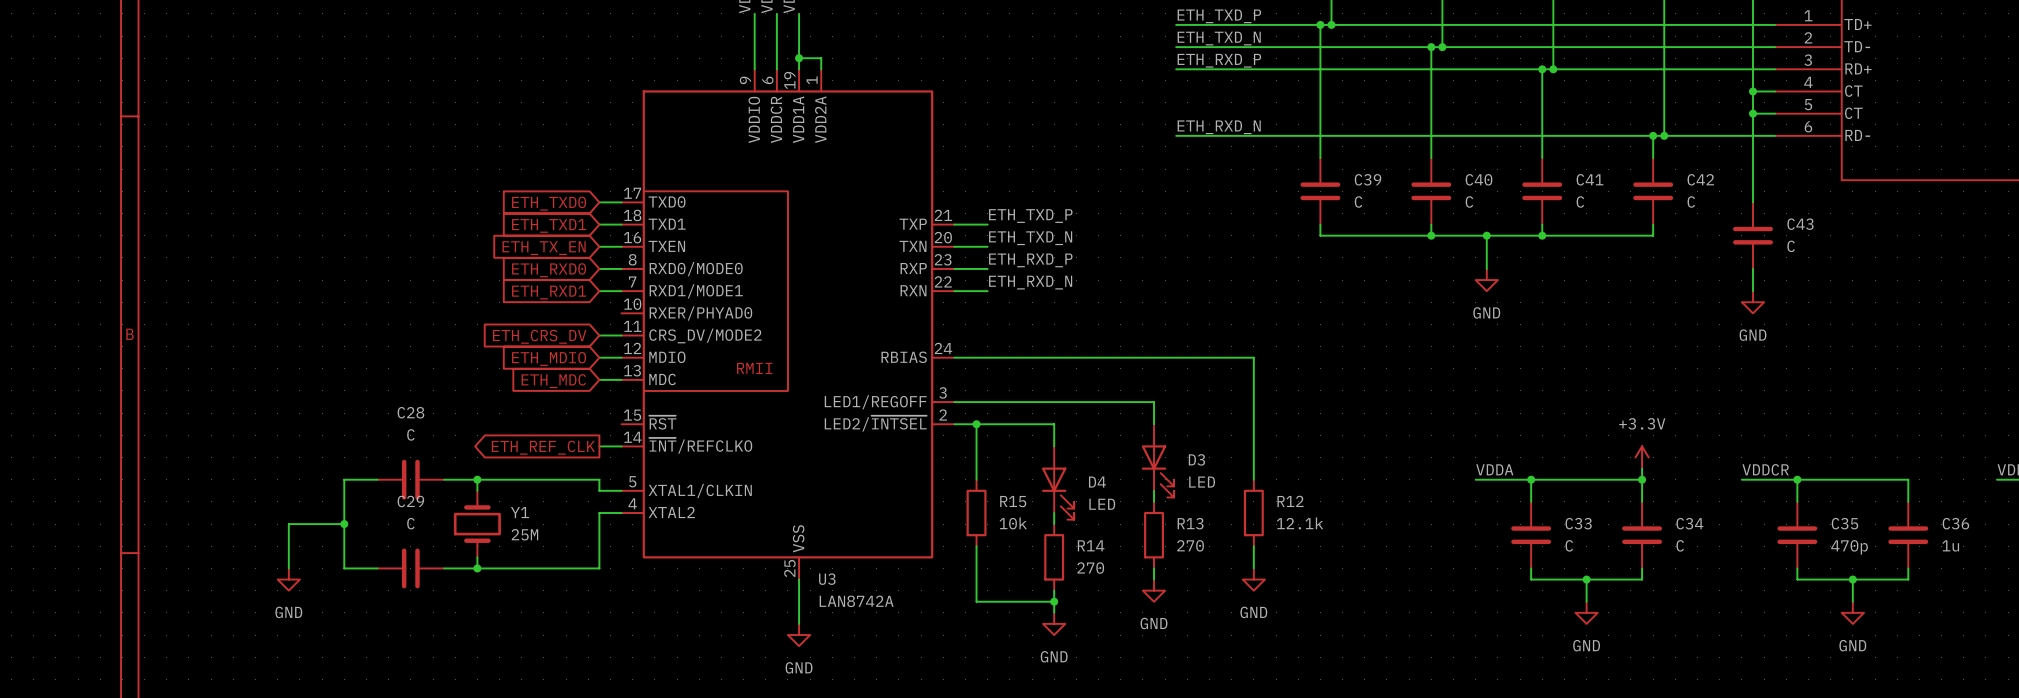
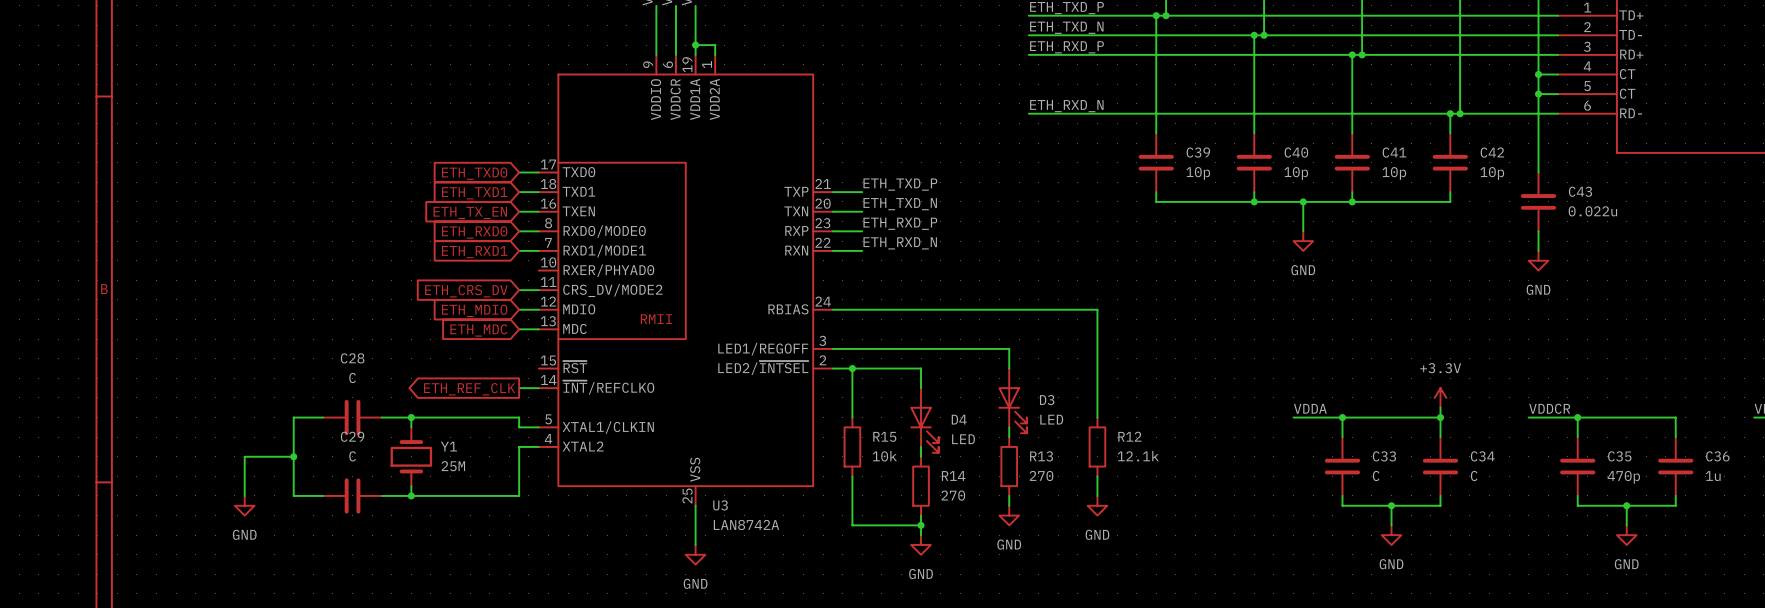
C39 value: C (1358, 201) -> 10p (1198, 173)
C40 value: C (1469, 201) -> 10p (1296, 173)
C41 value: C (1580, 201) -> 10p (1394, 173)
C42 value: C (1691, 201) -> 10p (1492, 173)
C43 value: C (1791, 246) -> 0.022u (1592, 211)

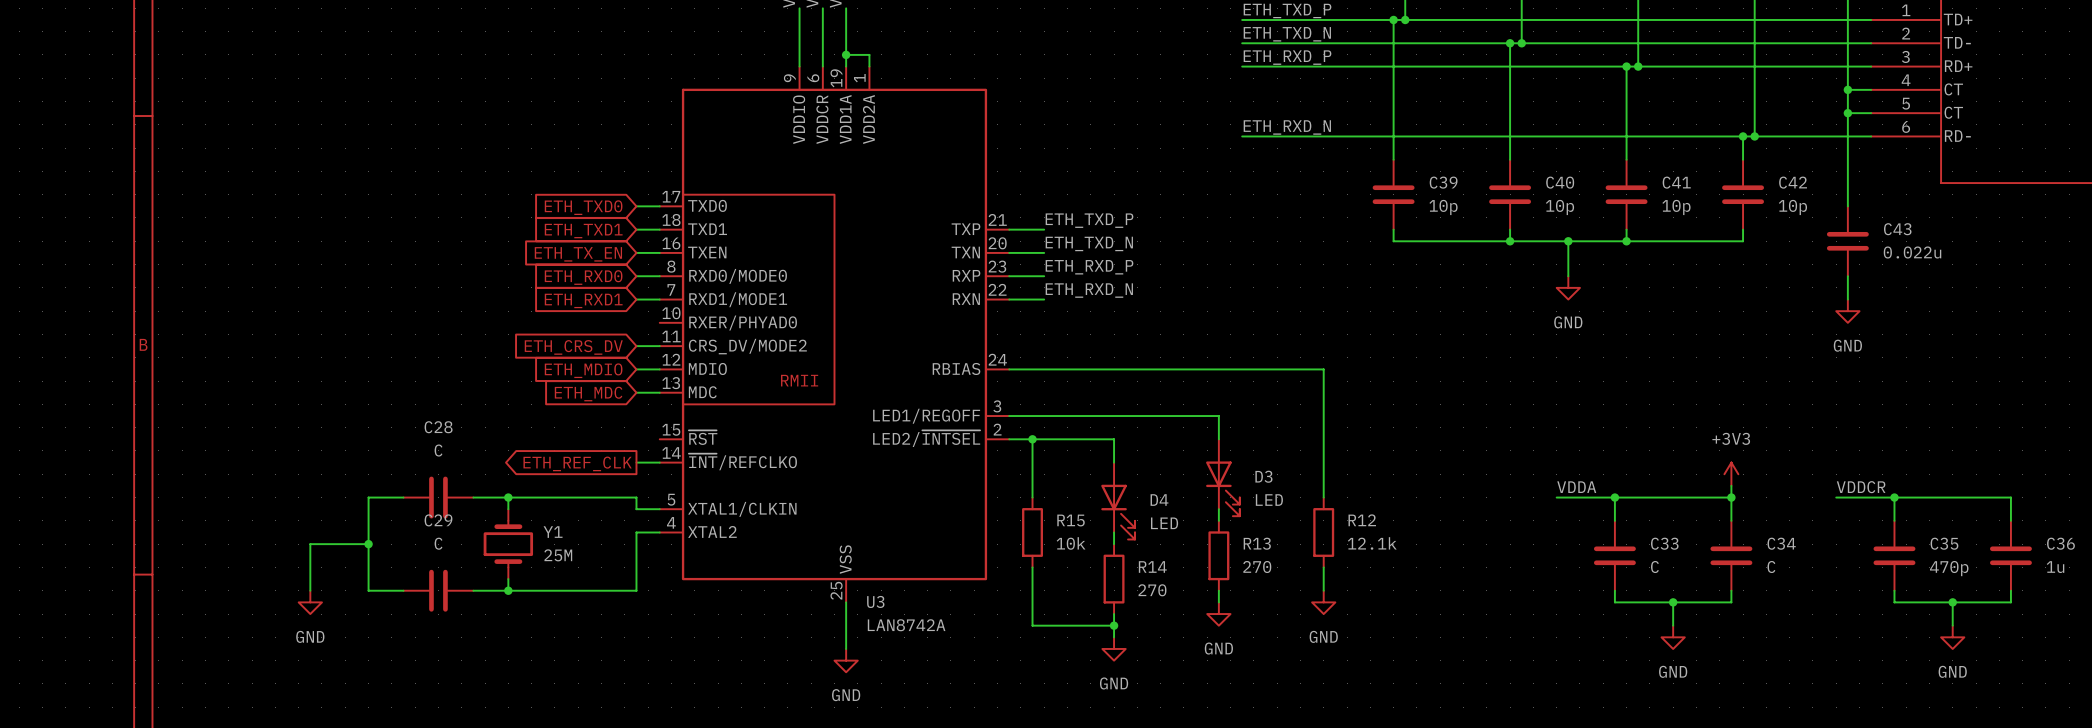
power symbol: +3.3V (1440, 397) -> +3V3 (1731, 474)

